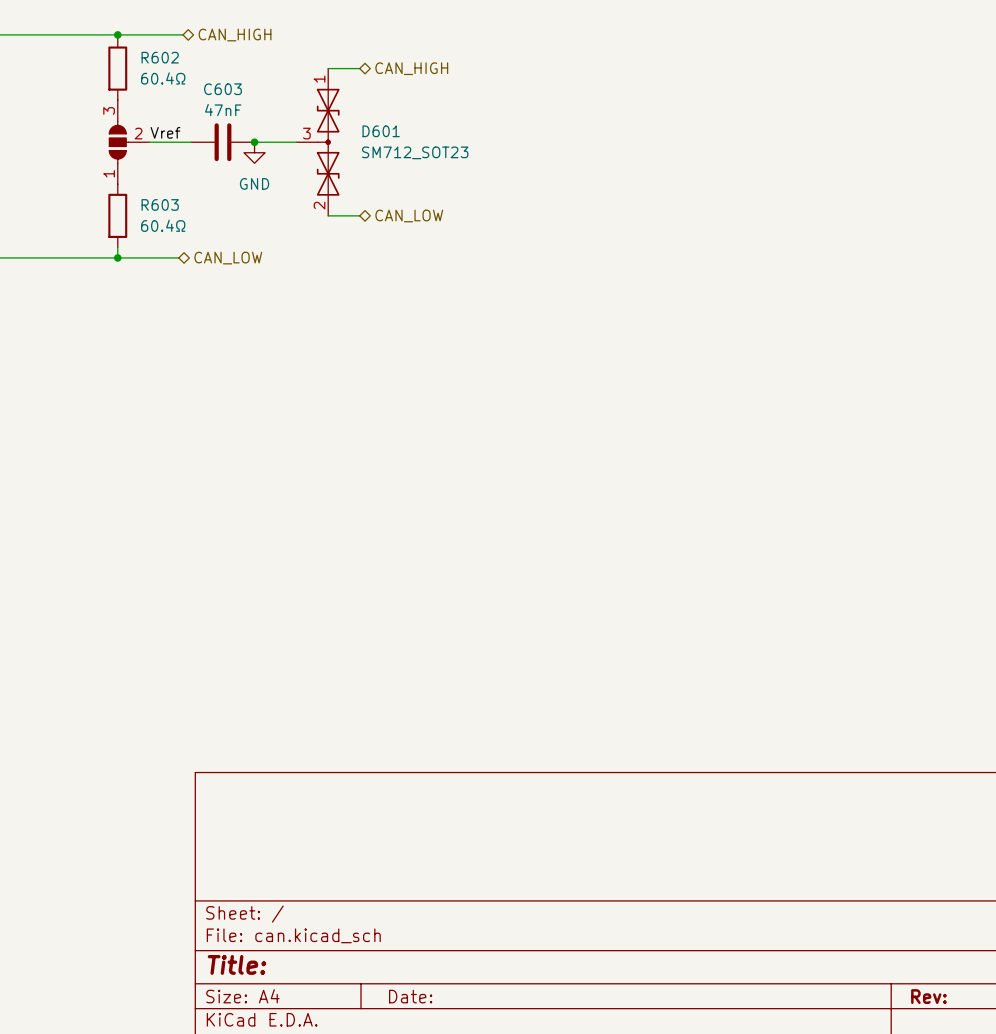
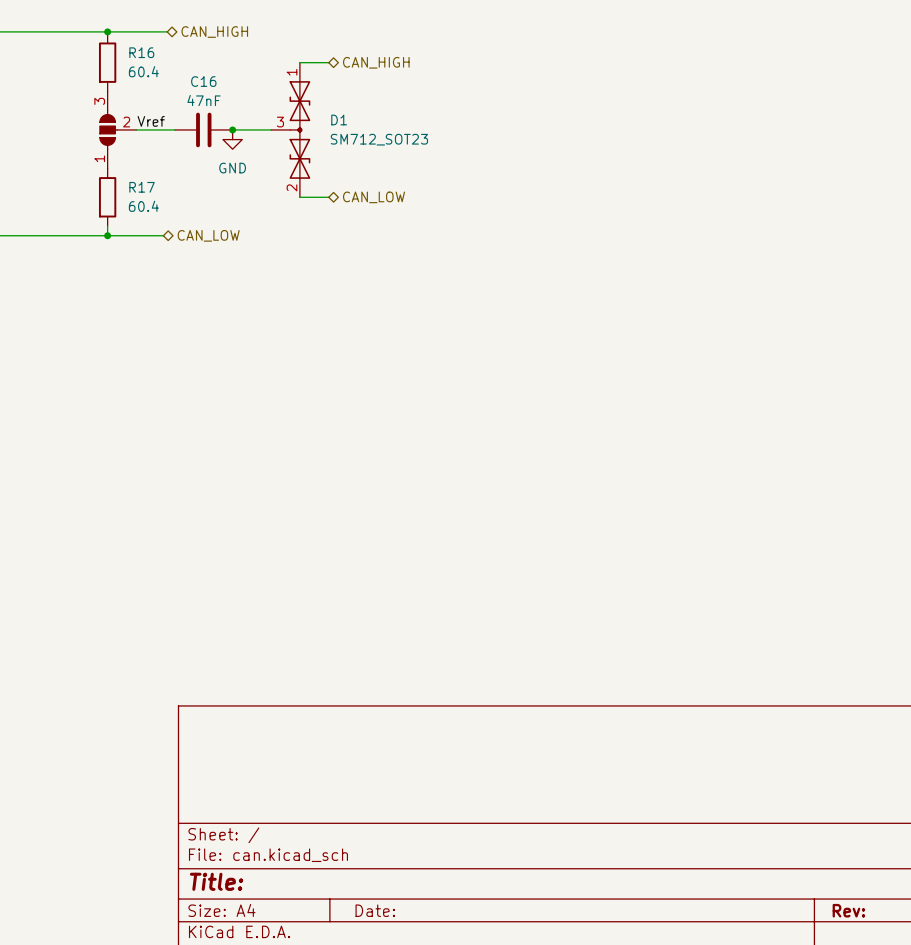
R602 name: R602 (160, 57) -> R16 (141, 52)
R602 value: 60.4Ω (163, 78) -> 60.4 (143, 71)
C603 name: C603 (222, 89) -> C16 (203, 81)
D601 name: D601 (381, 131) -> D1 (339, 120)
R603 name: R603 (160, 204) -> R17 (142, 187)
R603 value: 60.4Ω (163, 225) -> 60.4 (143, 206)

